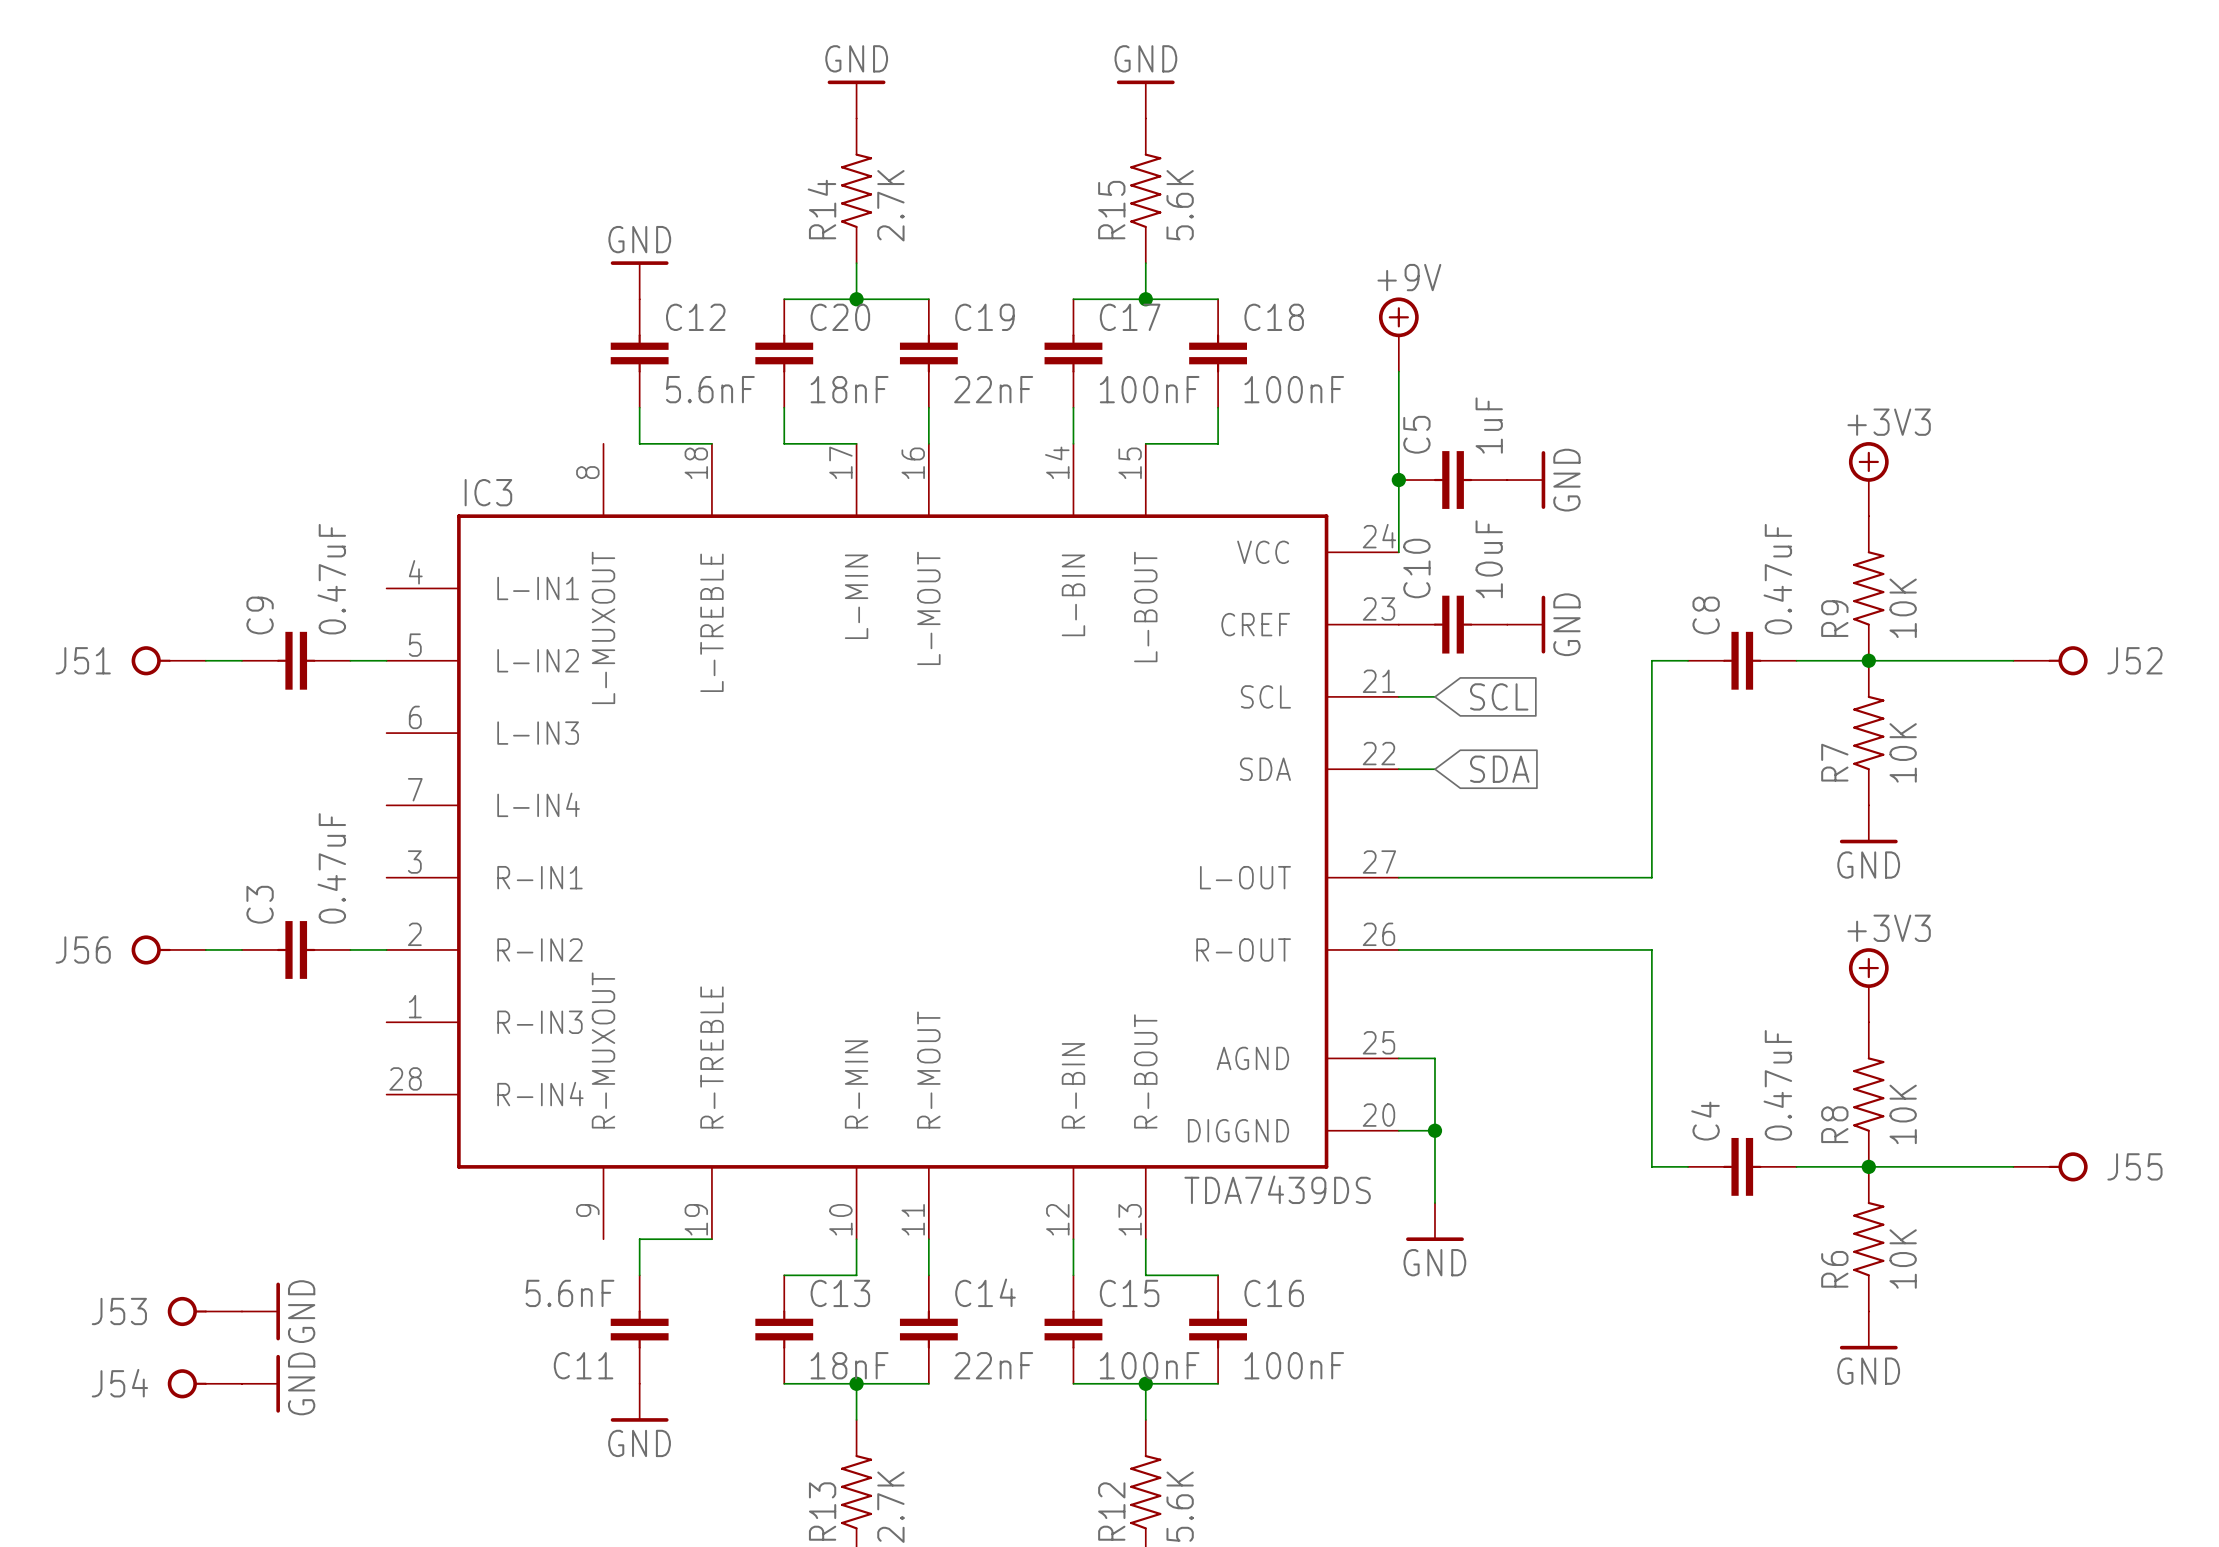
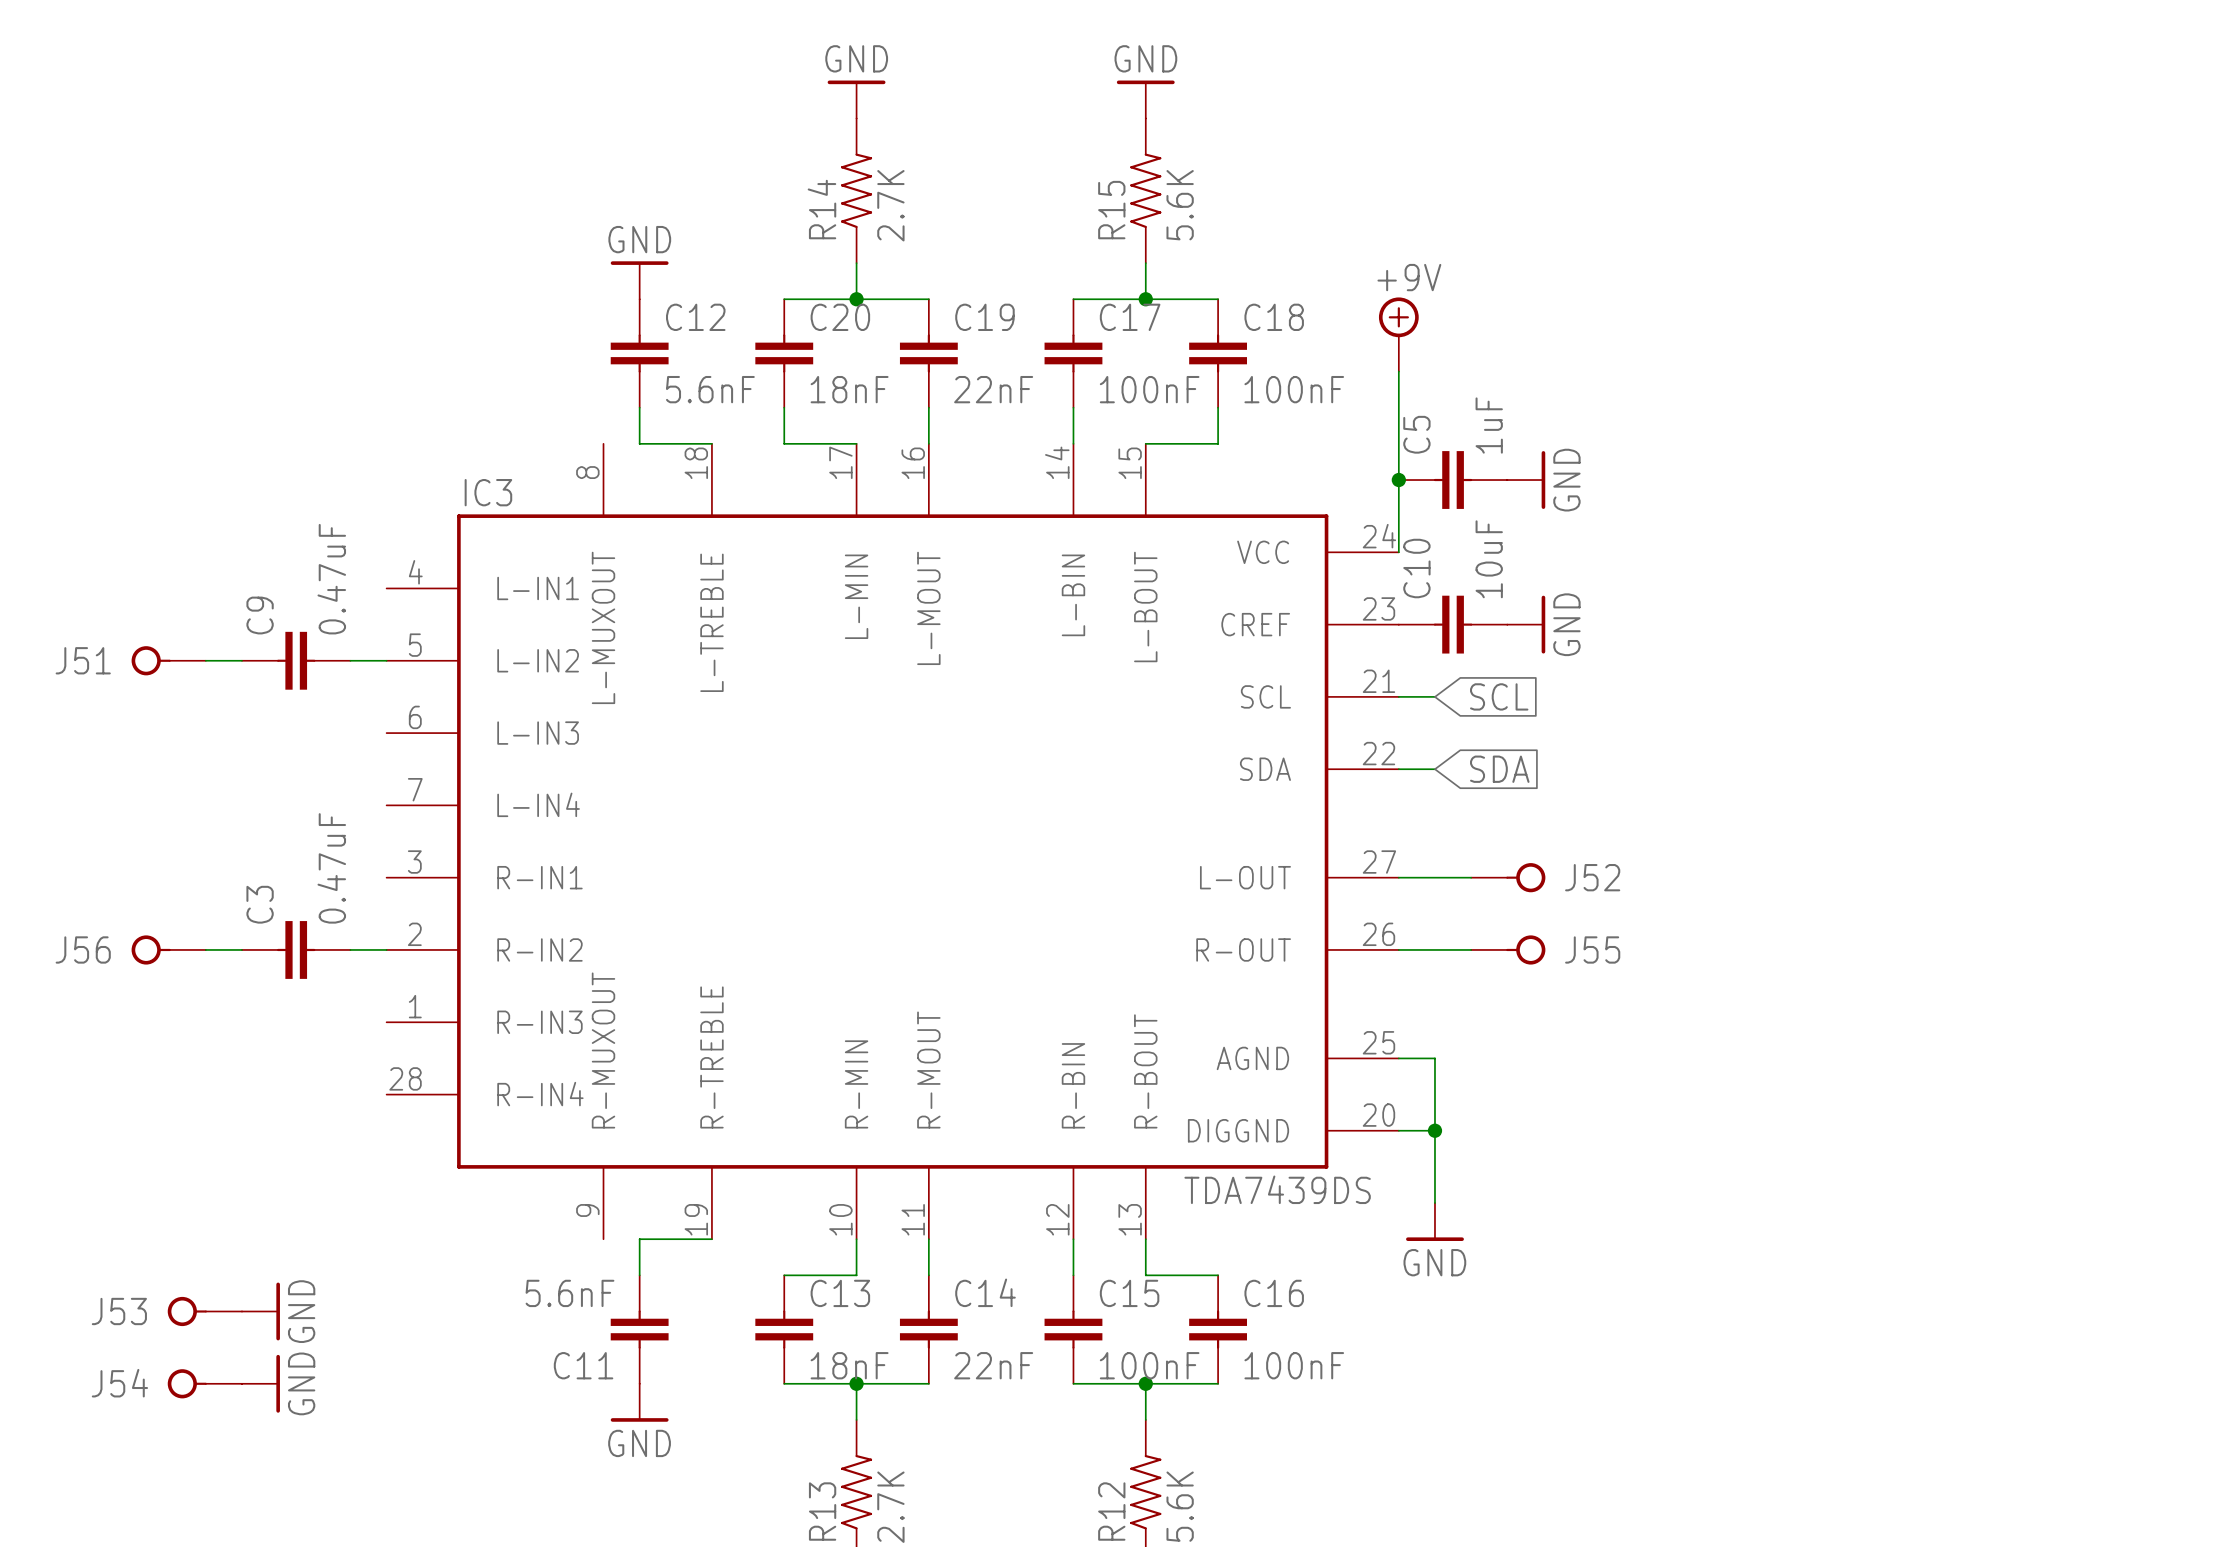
power symbol: +3V3 (1868, 479) -> none
R9: 10K (1868, 588) -> none
wire: (1688, 660) (1651, 660) (1651, 877) (1471, 877) -> none
C8: 0.47uF (1742, 660) -> none
wire: (1796, 660) (2013, 660) -> none
junction: (1868, 660) -> none
J52 position: (2050, 660) -> (1508, 877)
R7: 10K (1868, 733) -> none
power symbol: GND (1868, 824) -> none
wire: (1471, 949) (1651, 949) (1651, 1166) (1688, 1166) -> none
power symbol: +3V3 (1868, 985) -> none
R8: 10K (1868, 1094) -> none
C4: 0.47uF (1742, 1166) -> none
wire: (1796, 1166) (2013, 1166) -> none
junction: (1868, 1166) -> none
J55 position: (2050, 1166) -> (1508, 949)
R6: 10K (1868, 1239) -> none
power symbol: GND (1868, 1330) -> none

